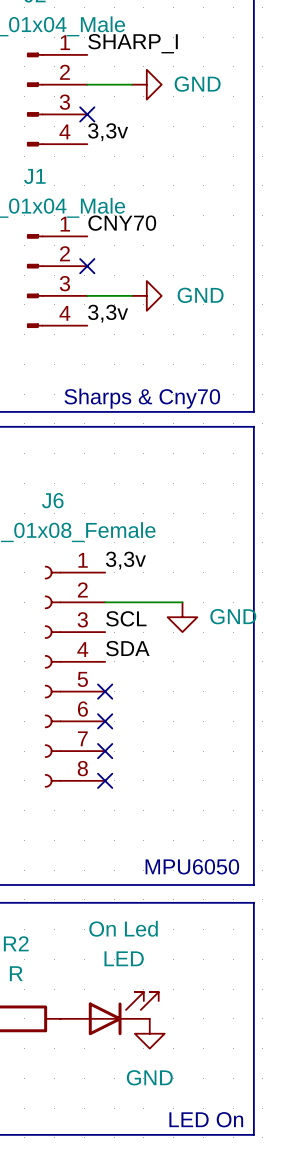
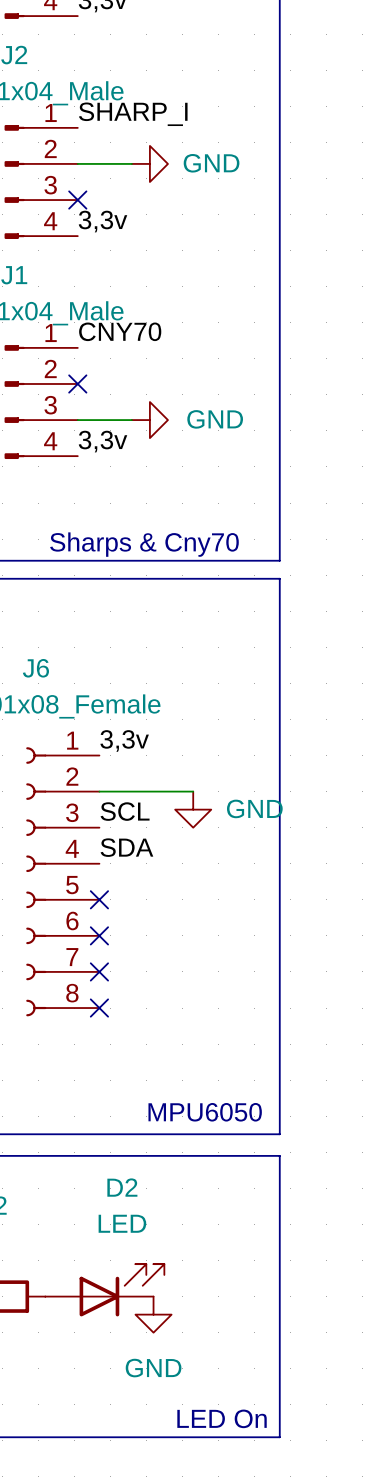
On Led name: On Led (123, 928) -> D2 (122, 1187)

